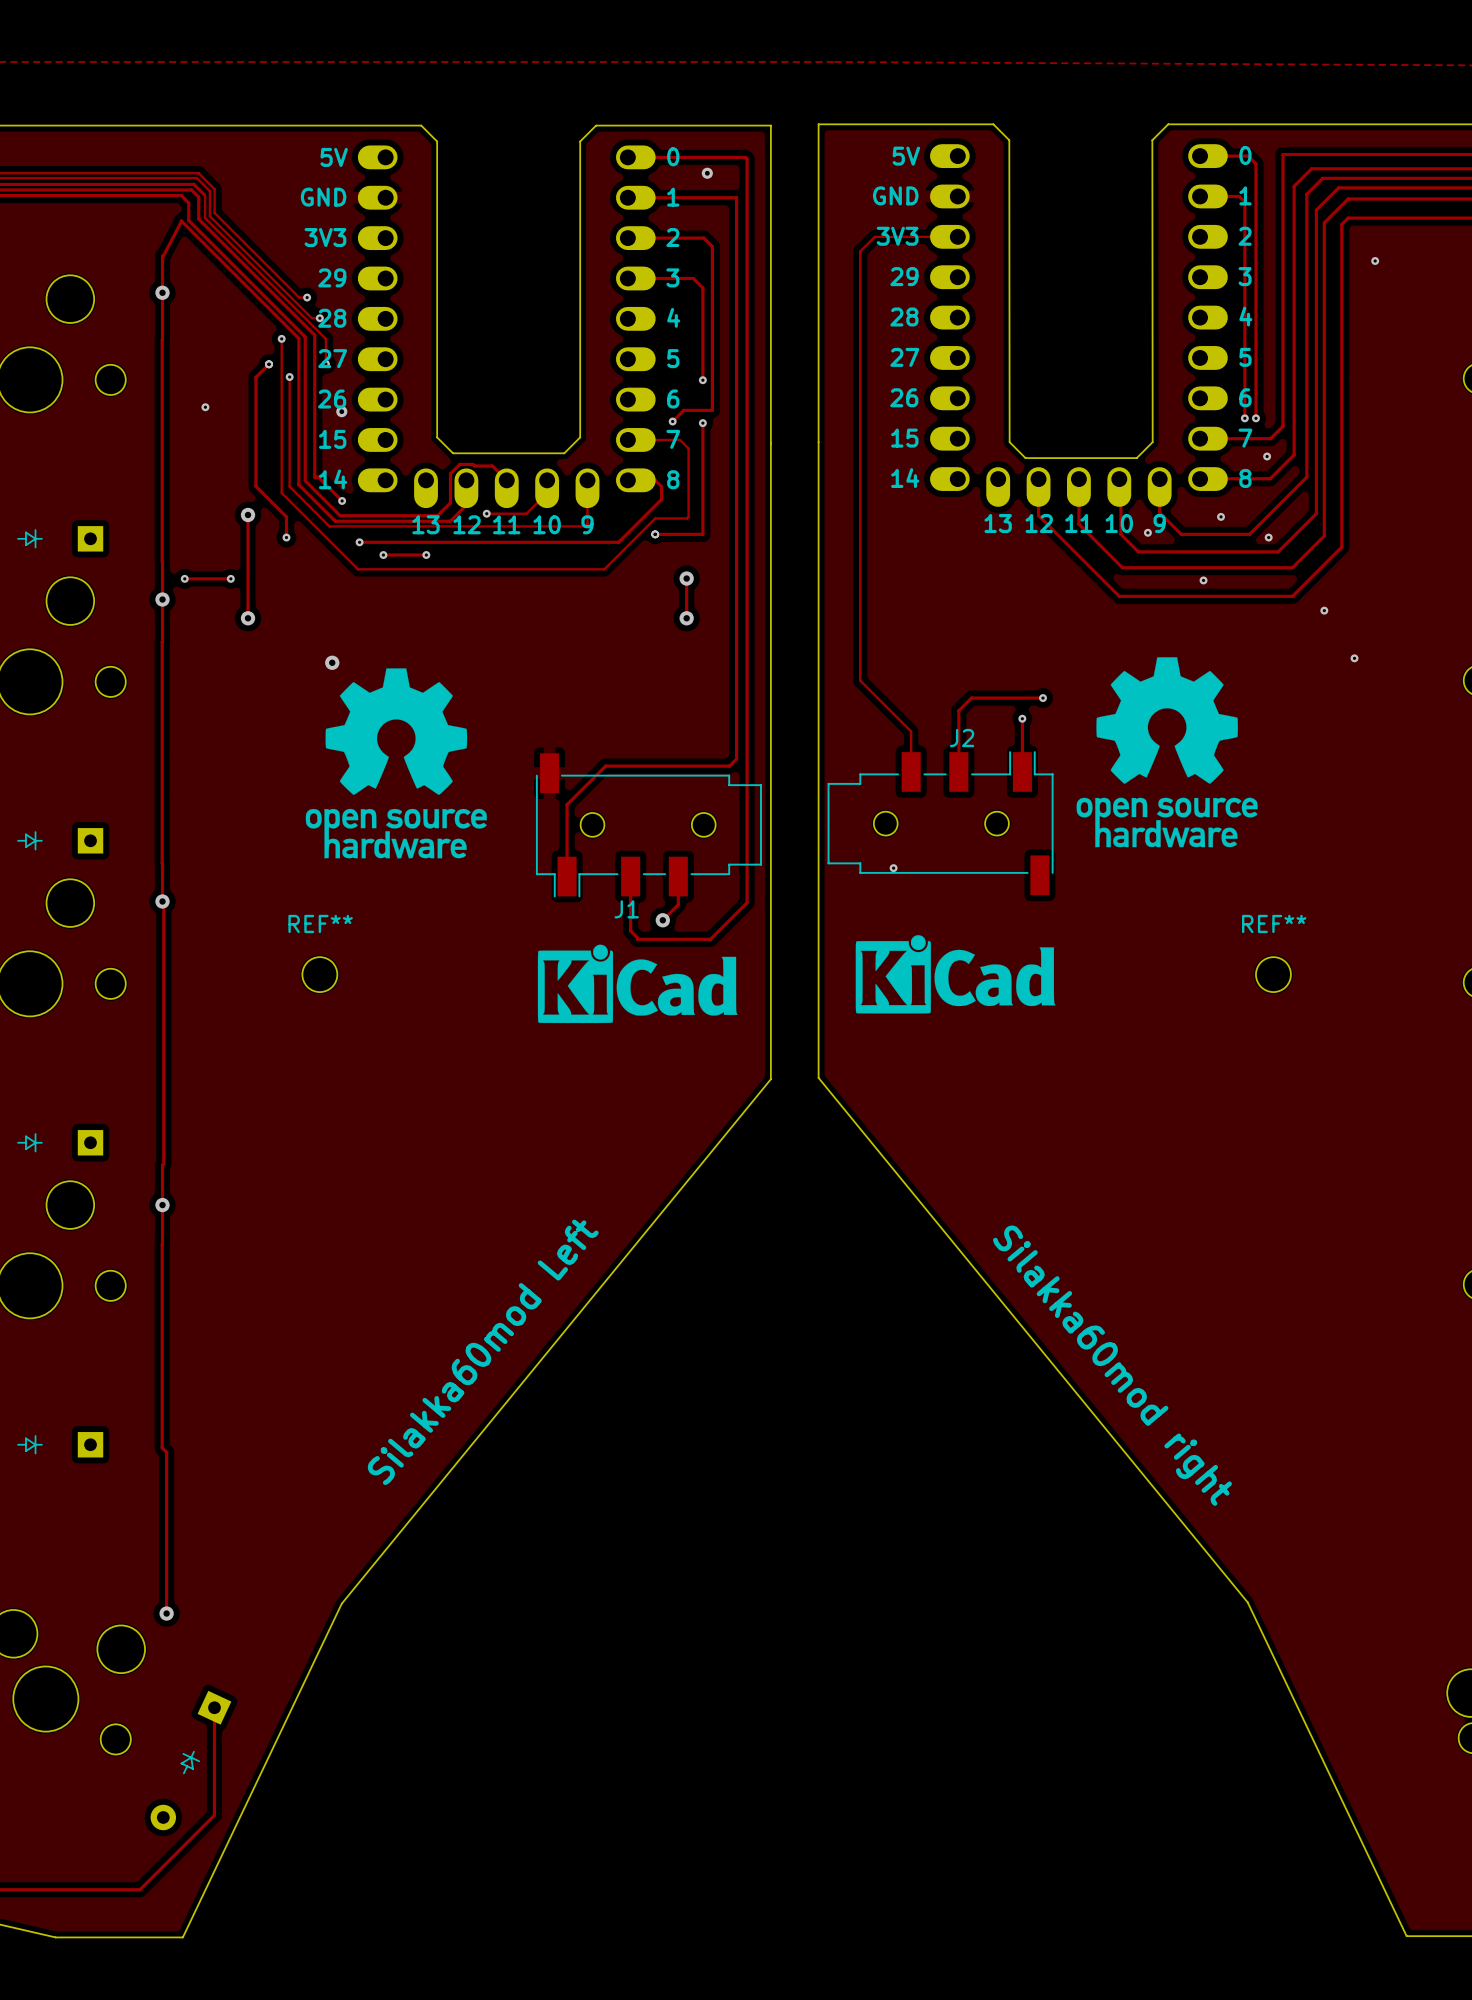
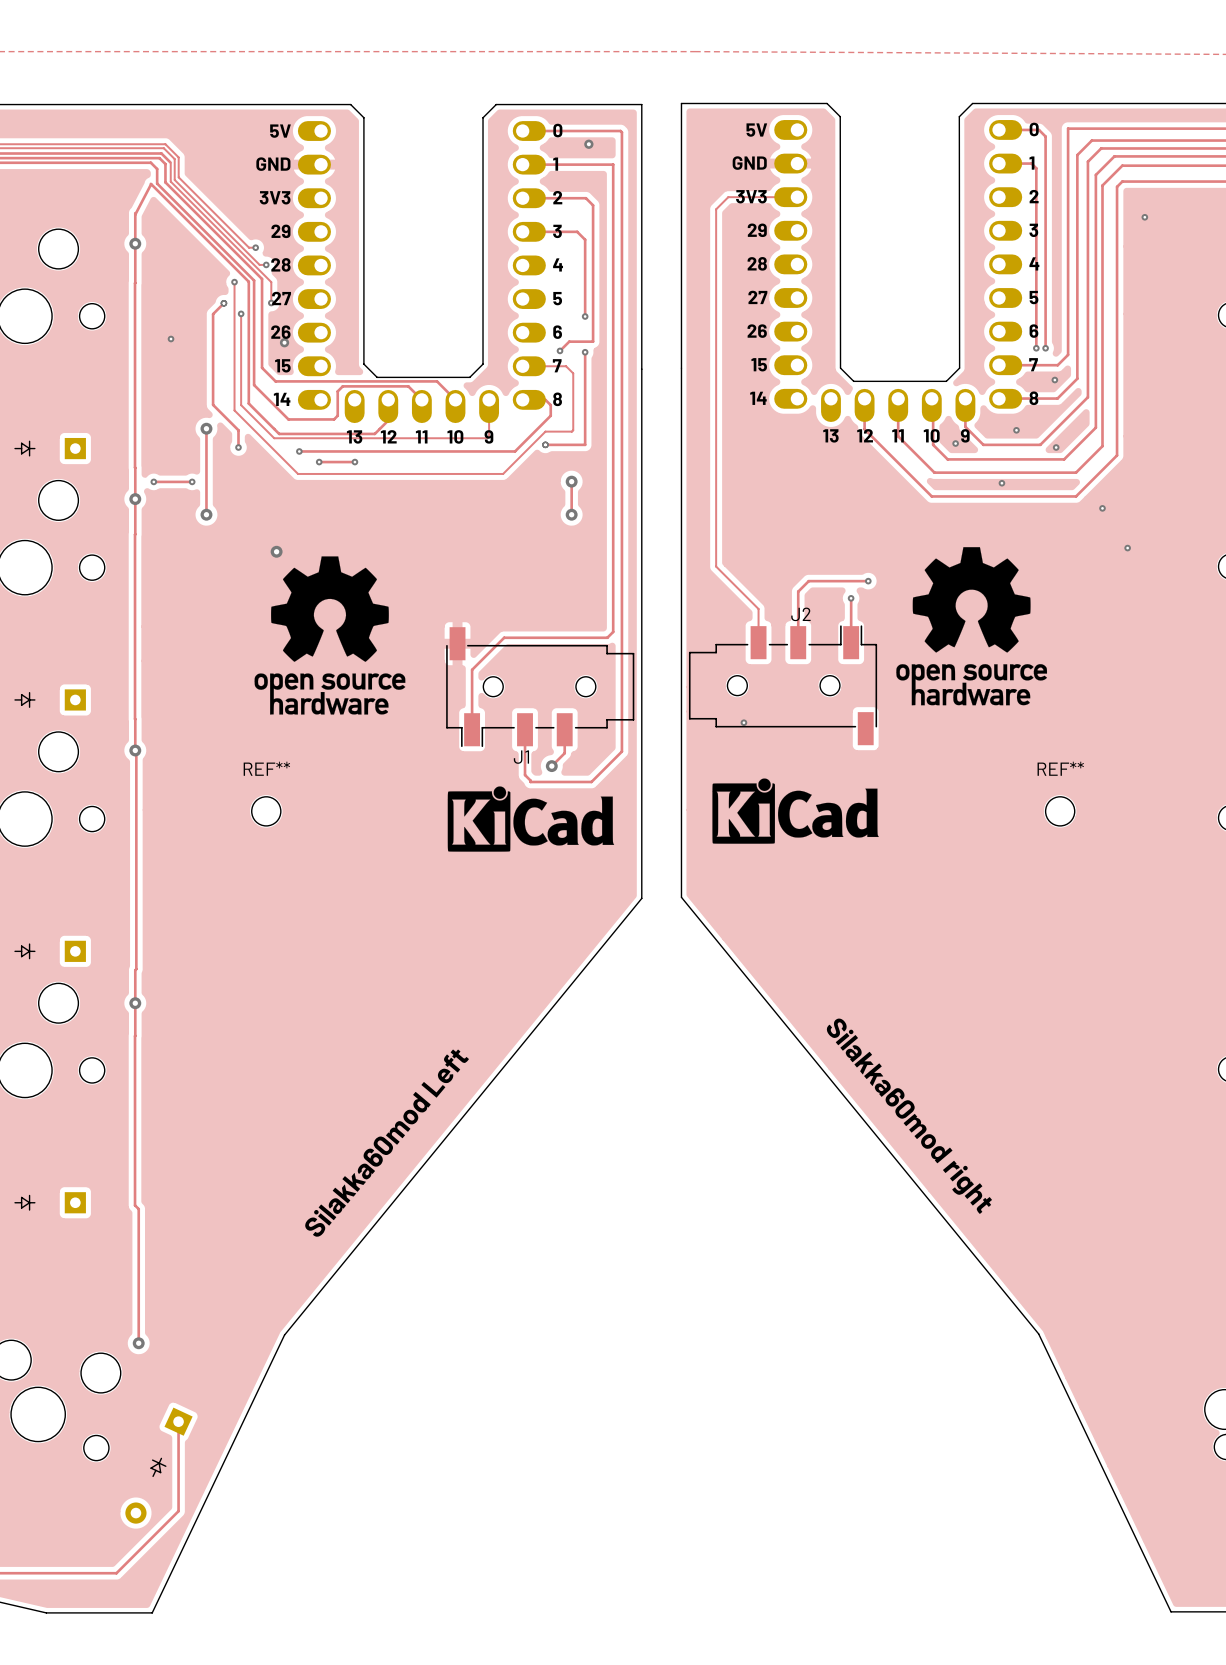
track: (314, 441) (314, 476) (318, 477) (342, 500) -> none
track: (305, 462) (305, 480) (340, 515) (437, 515) (450, 502) (450, 473) (459, 464) (492, 466) -> (254, 385) (288, 419) (334, 419) (337, 415) (337, 391) (342, 386) (408, 386) (409, 387)
track: (547, 480) (547, 493) (526, 513) (486, 513) -> (455, 399) (437, 381) (275, 381) (262, 367)
via: (342, 500) -> none
via: (486, 513) -> none

